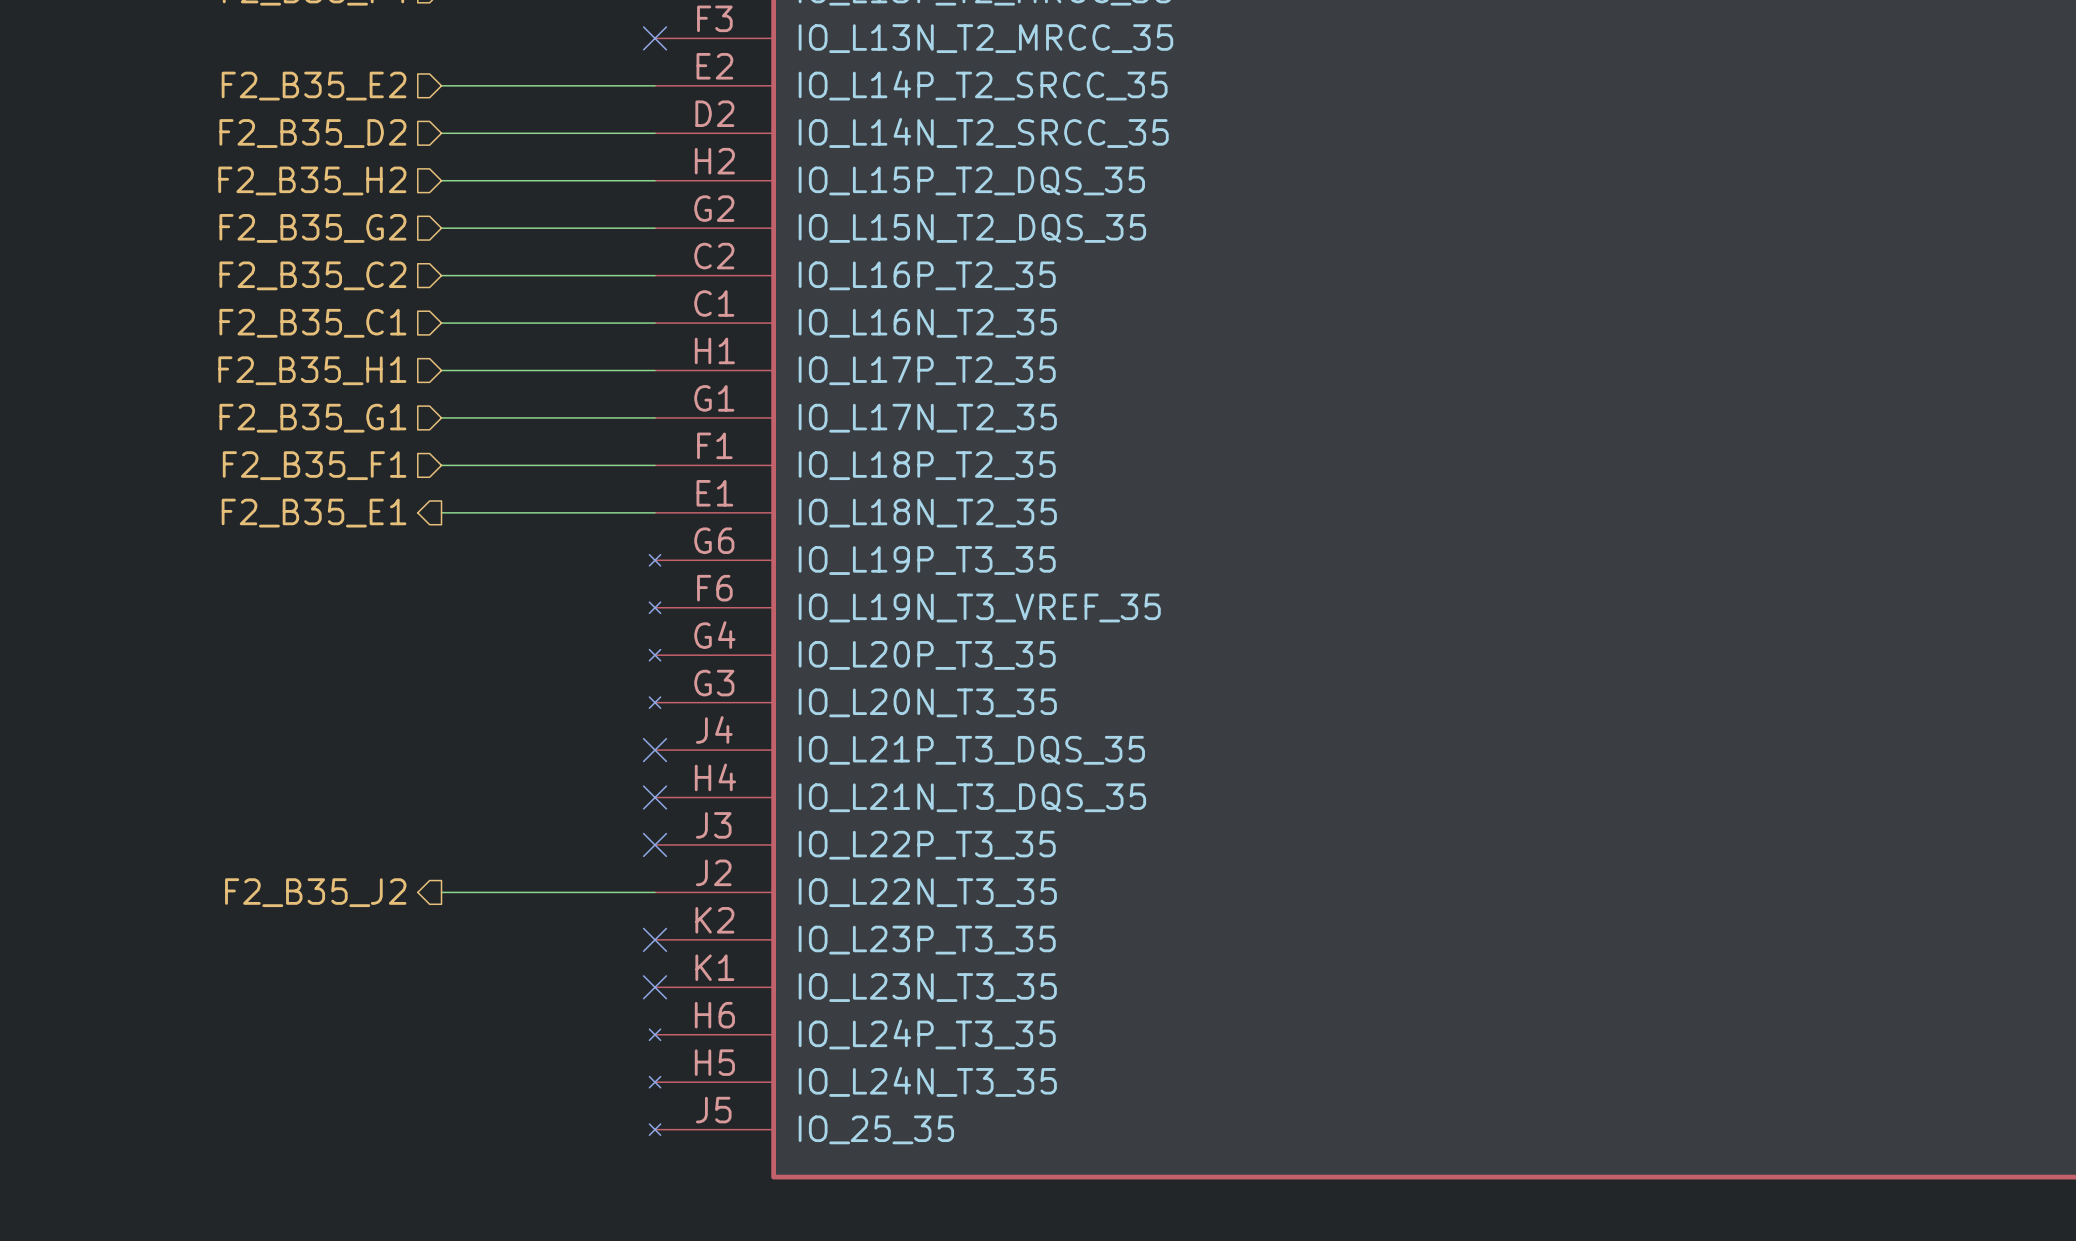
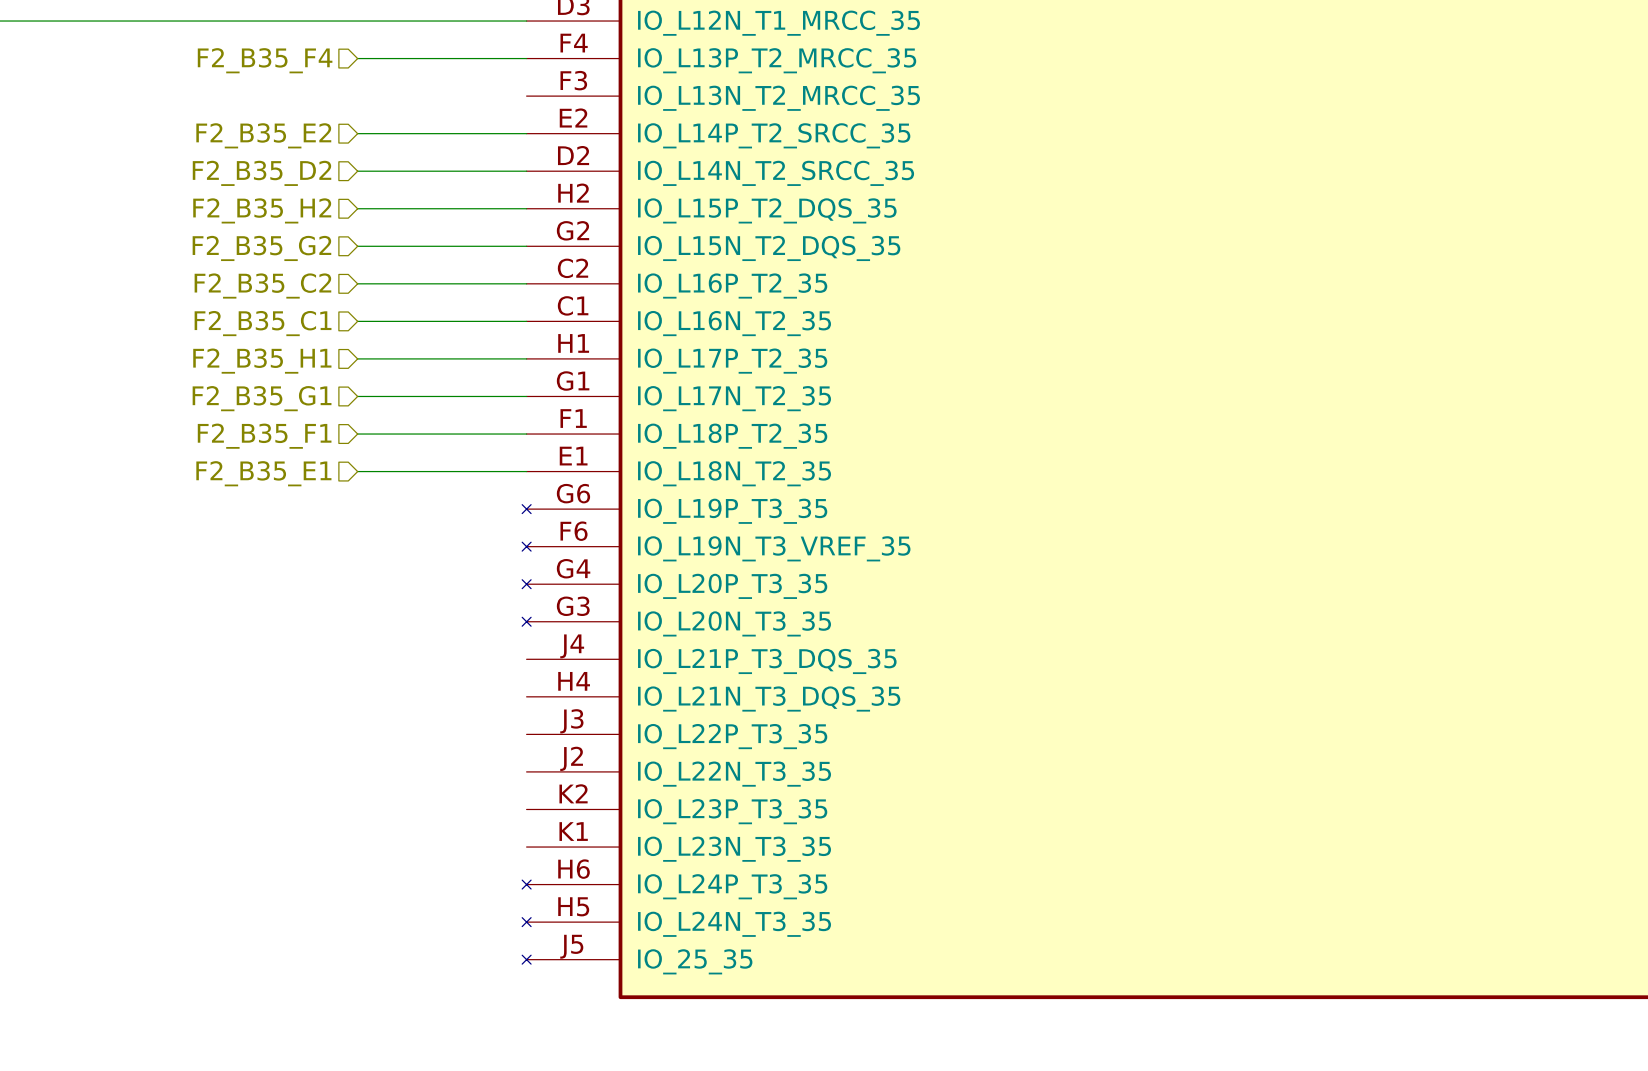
no-connect mark: (655, 38) -> none
hierarchical label shape: output (314, 513) -> input (263, 473)
no-connect mark: (655, 750) -> none
no-connect mark: (655, 797) -> none
no-connect mark: (655, 844) -> none
hierarchical label: F2_B35_J2 (315, 892) -> none
wire: (441, 892) (655, 892) -> none
no-connect mark: (655, 939) -> none
no-connect mark: (655, 987) -> none

